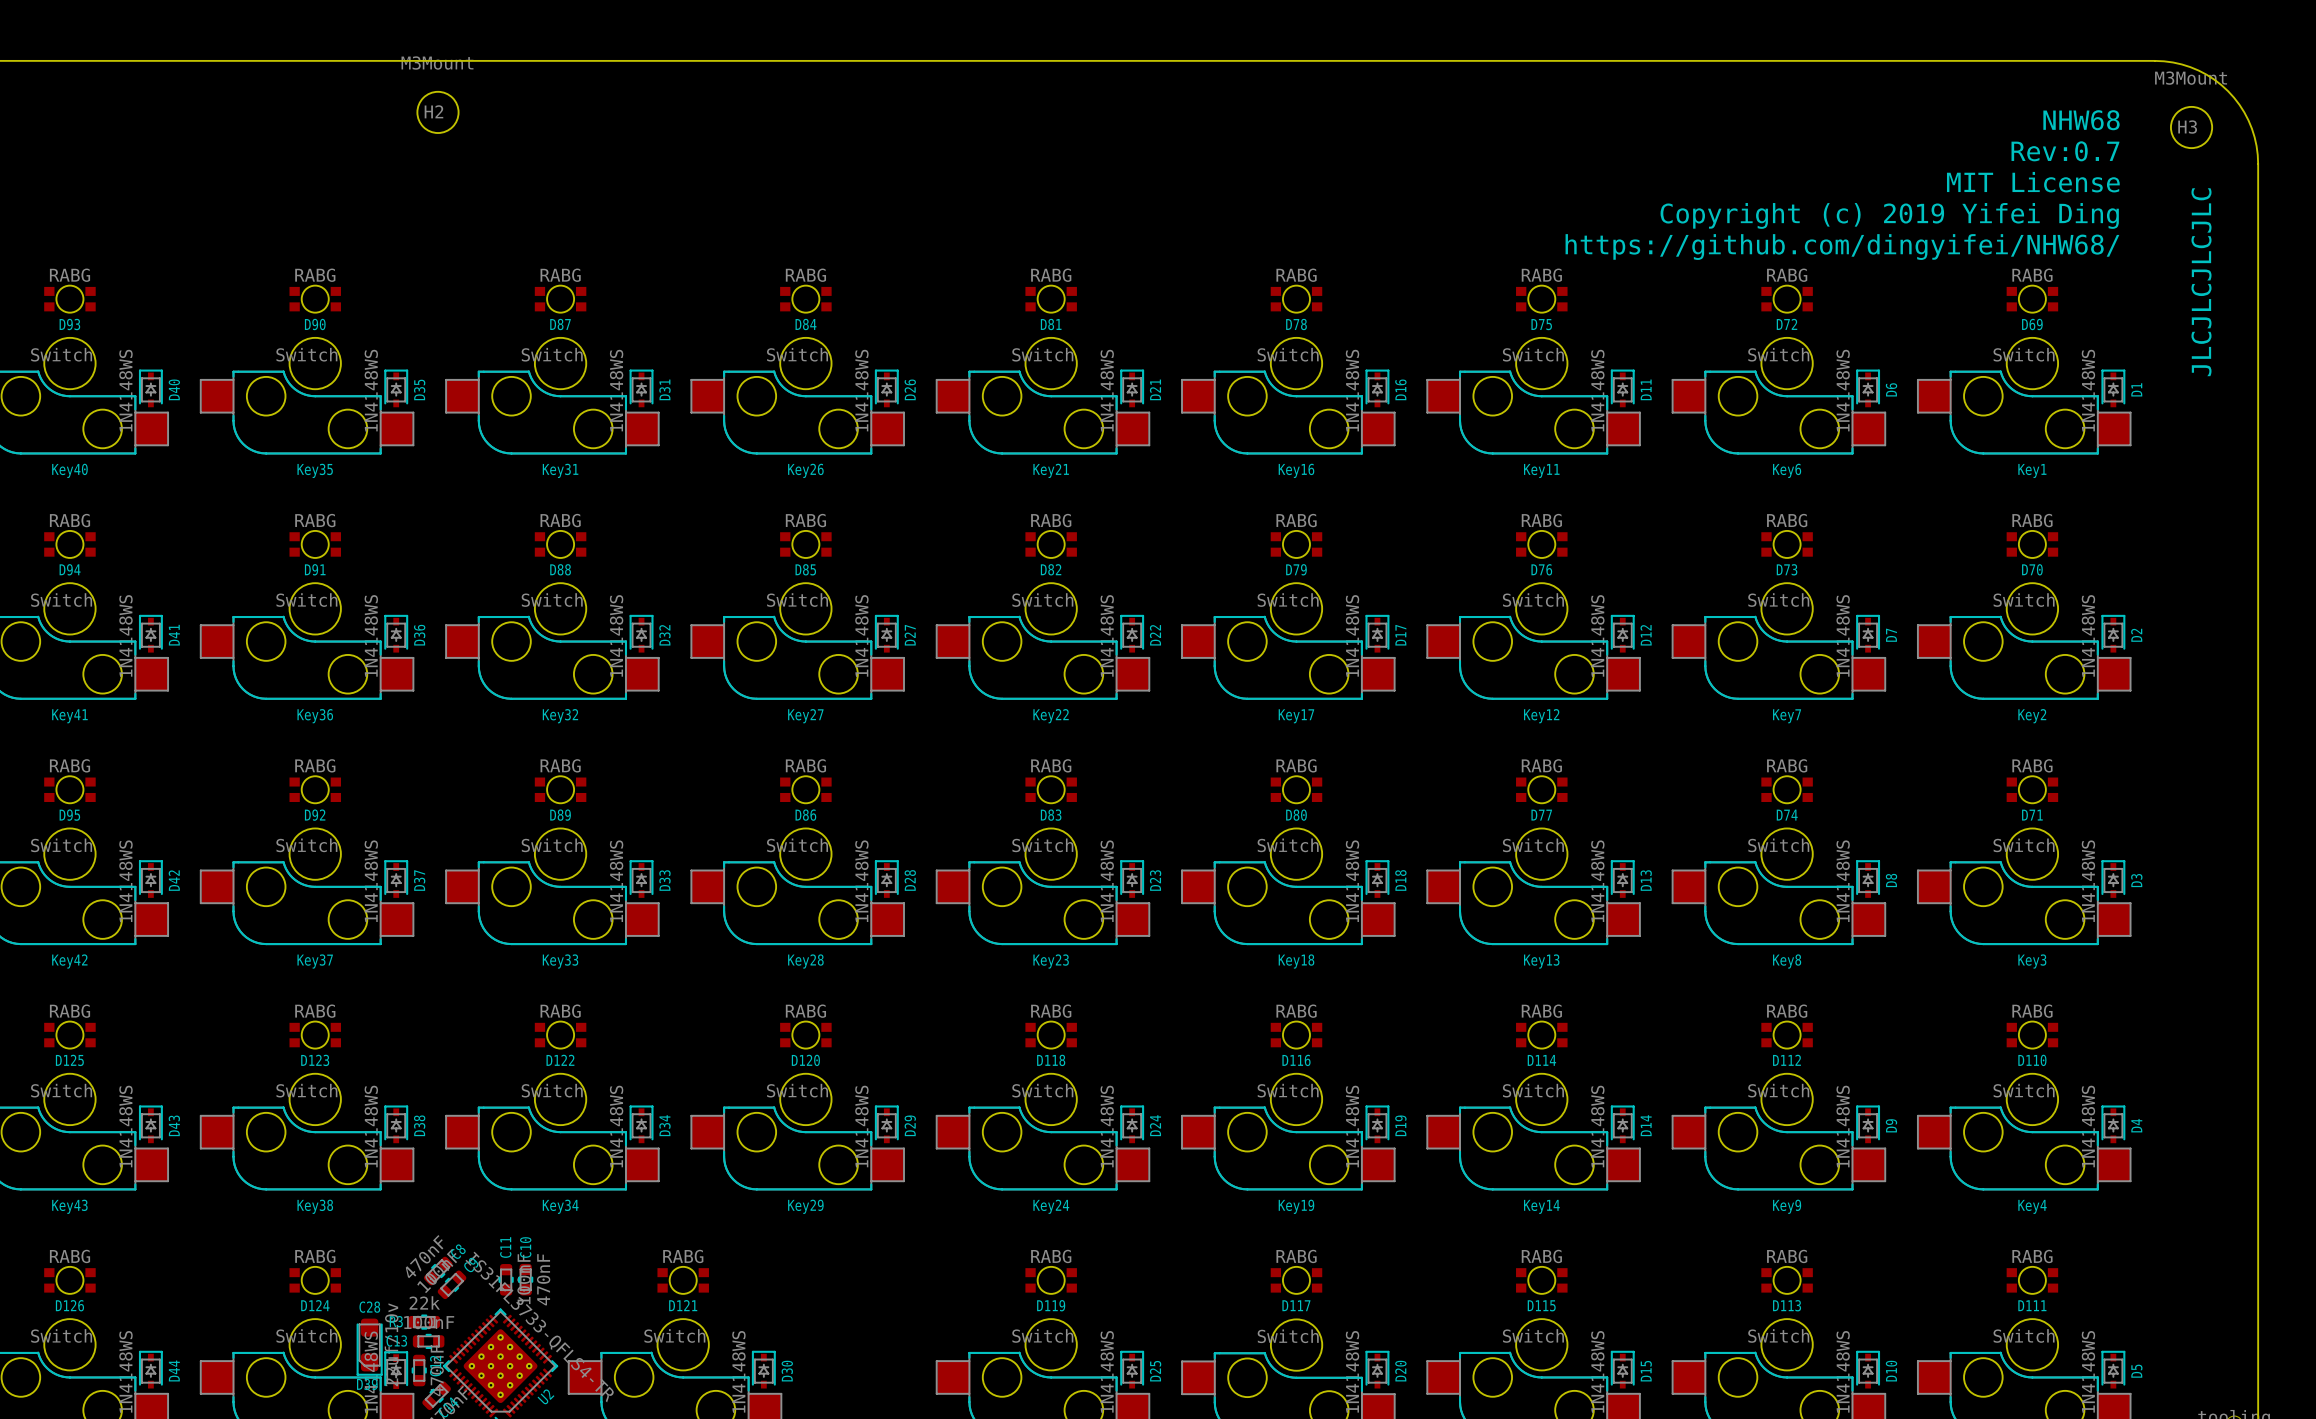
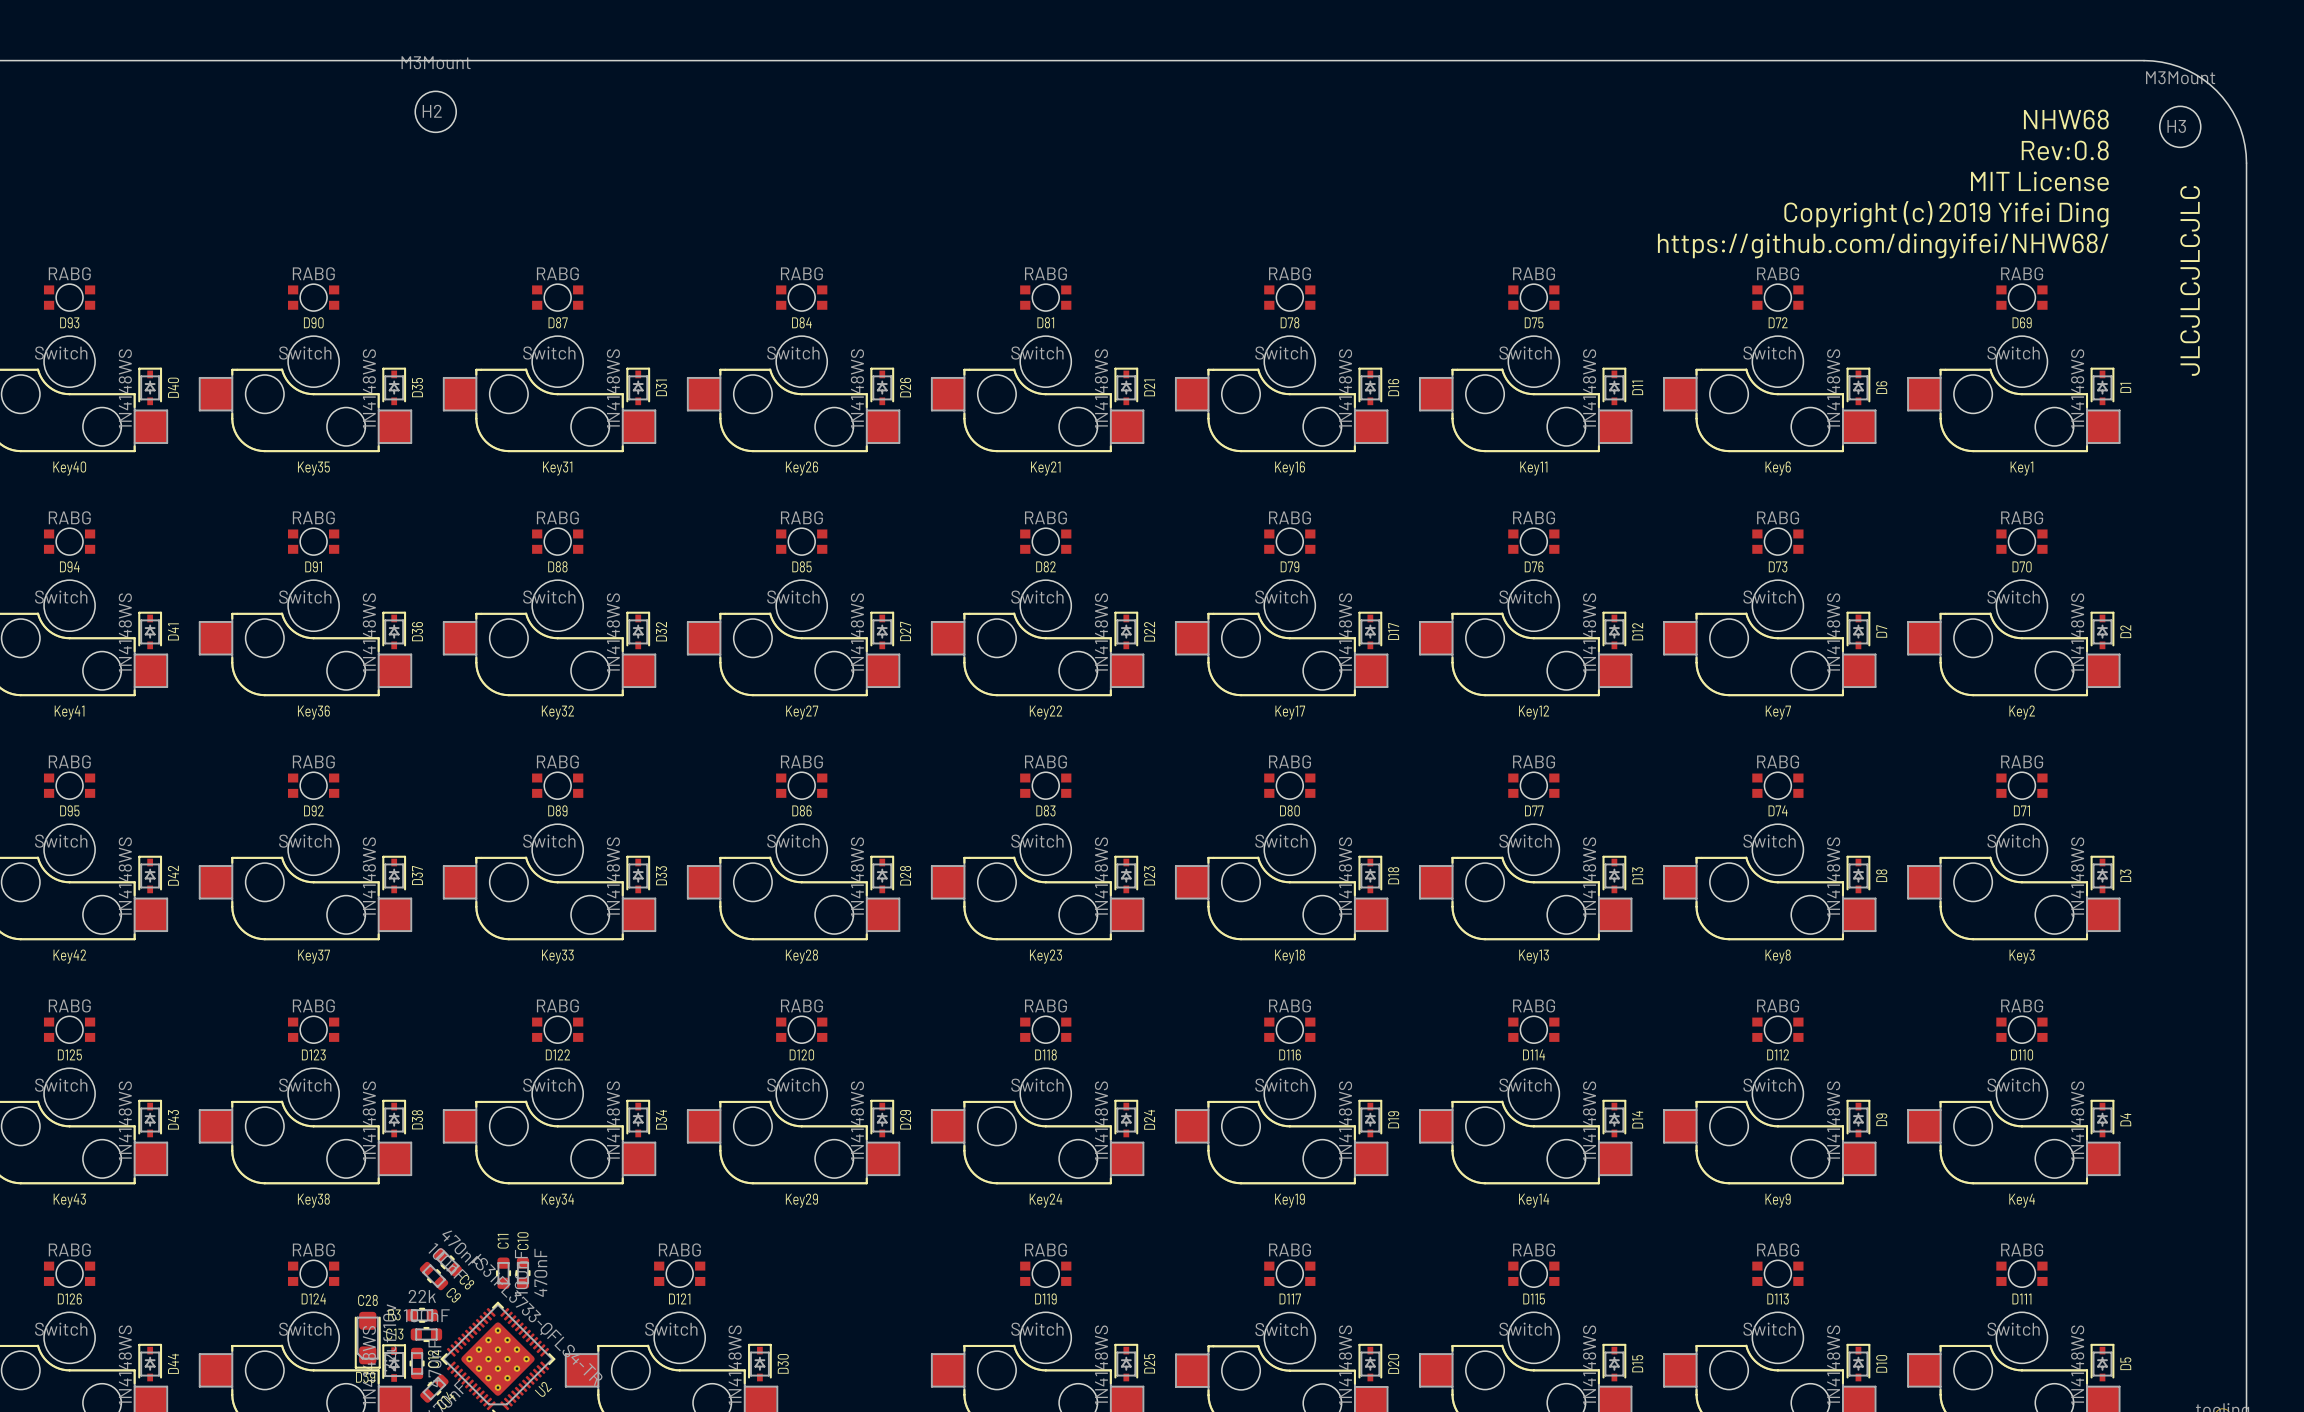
text: Rev:0.7 (2065, 151) -> Rev:0.8 (2065, 150)
C8 rotation: 0° (438, 1271) -> 90° clockwise (447, 1262)
C9 rotation: 0° (452, 1284) -> 90° clockwise (434, 1276)

